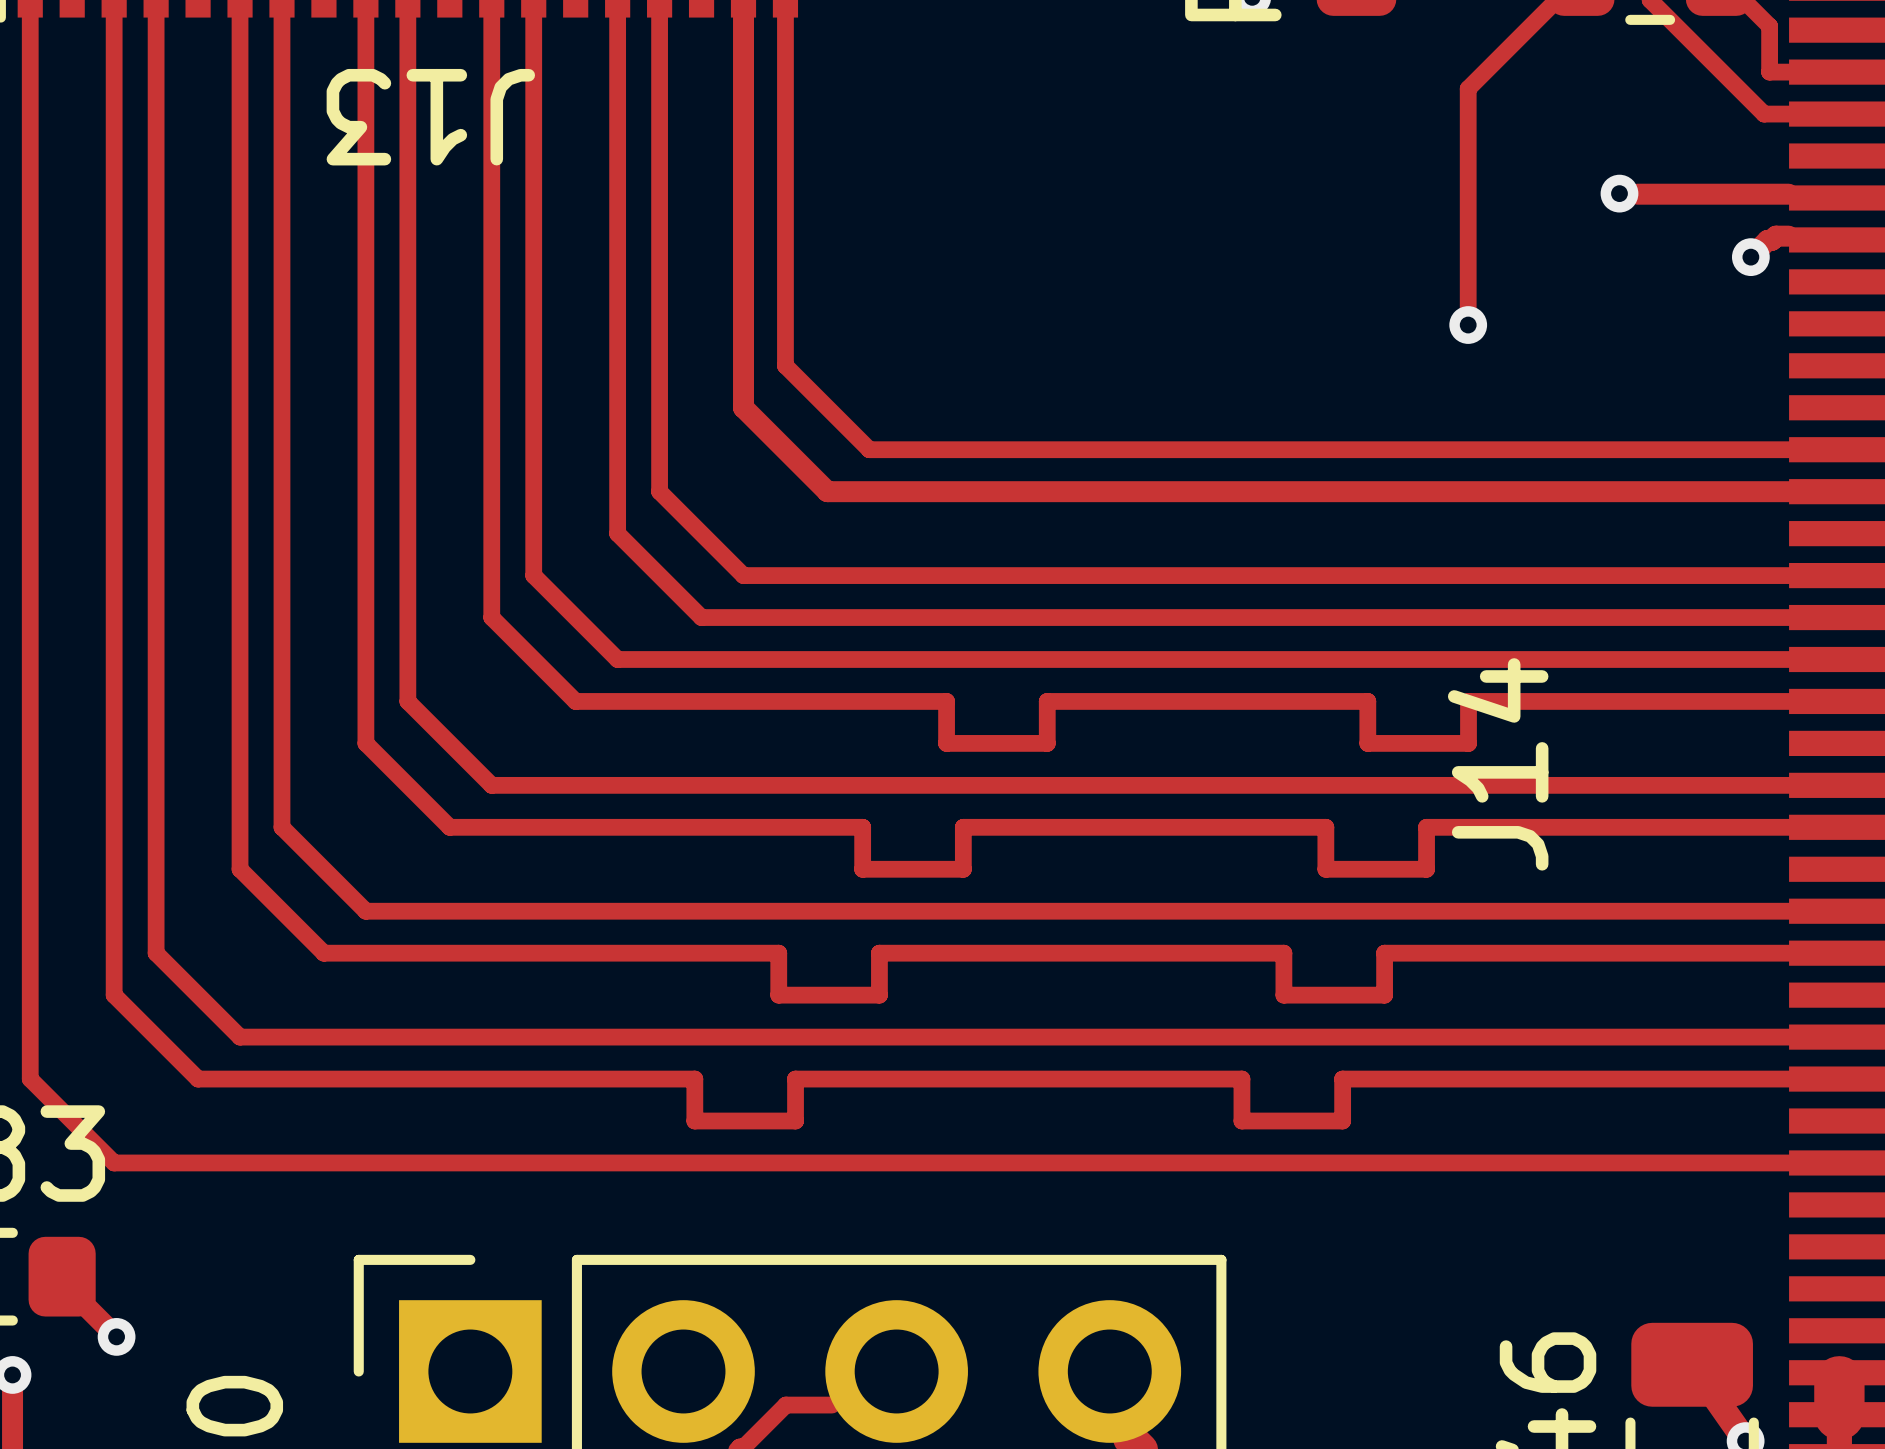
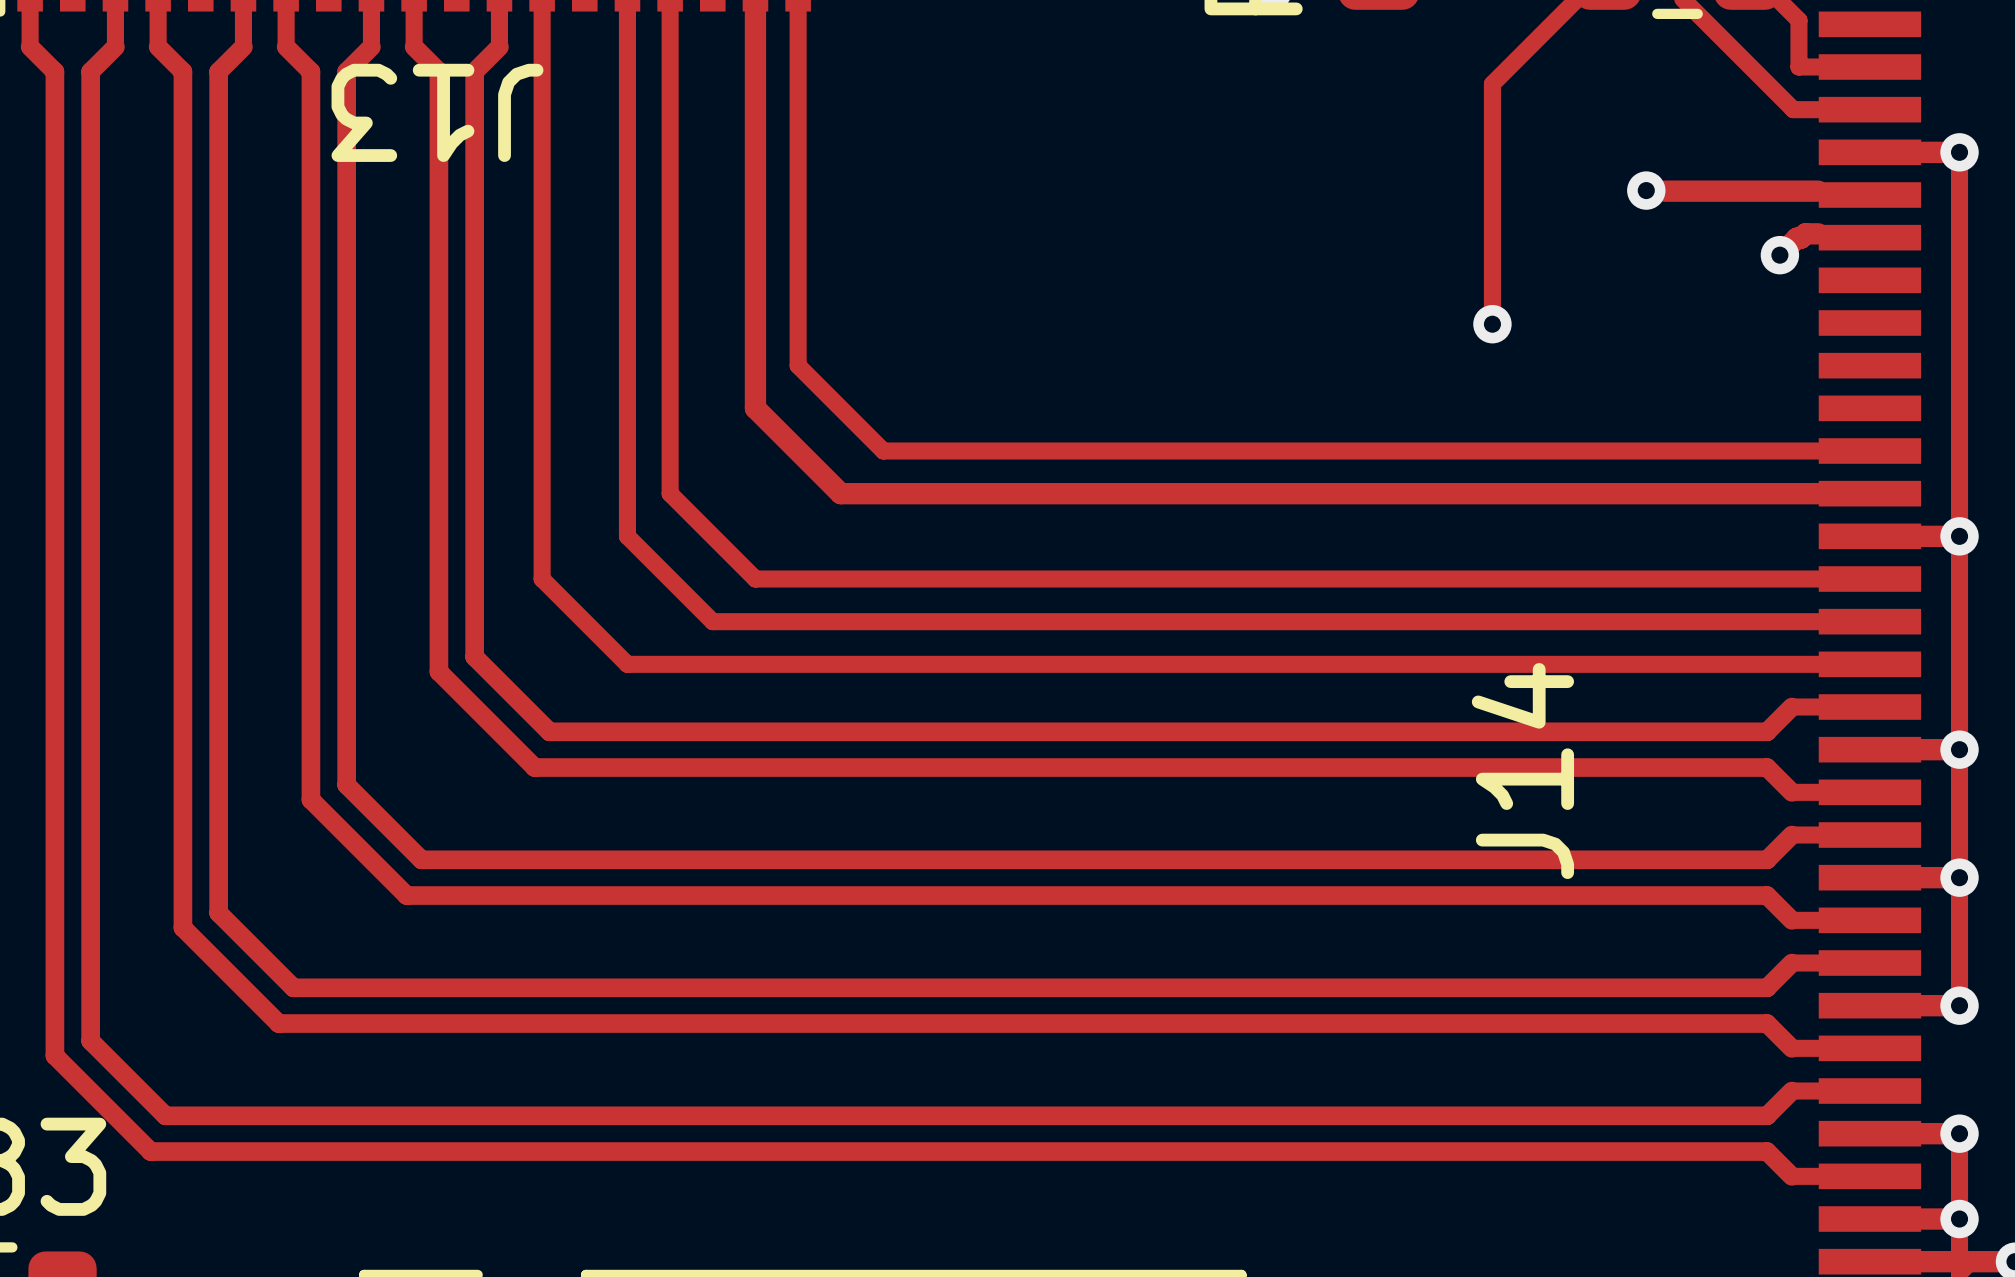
track: (30, 52) (30, 1079) (114, 1162) (1762, 1162) -> (30, 46) (54, 71) (54, 1055) (150, 1151) (1767, 1151) (1791, 1176)
track: (114, 52) (114, 995) (198, 1079) (694, 1079) (694, 1121) (795, 1121) (795, 1079) (1241, 1079) (1241, 1121) (1342, 1121) (1342, 1079) (1762, 1079) -> (115, 46) (90, 71) (90, 1040) (165, 1115) (1767, 1115) (1791, 1091)
track: (156, 52) (156, 953) (240, 1037) (1762, 1037) -> (158, 46) (182, 71) (182, 927) (278, 1023) (1767, 1023) (1791, 1048)
track: (240, 52) (240, 869) (323, 953) (778, 953) (778, 995) (879, 995) (879, 953) (1283, 953) (1283, 995) (1384, 995) (1384, 953) (1762, 953) -> (243, 46) (218, 71) (218, 912) (293, 987) (1767, 987) (1791, 963)
track: (281, 52) (281, 827) (365, 911) (1762, 911) -> (286, 46) (310, 71) (310, 799) (406, 895) (1767, 895) (1791, 920)
track: (365, 52) (365, 743) (449, 827) (862, 827) (862, 869) (963, 869) (963, 827) (1325, 827) (1325, 869) (1426, 869) (1426, 827) (1762, 827) -> (371, 46) (346, 71) (346, 784) (421, 859) (1767, 859) (1791, 835)
track: (407, 52) (407, 701) (491, 785) (1762, 785) -> (414, 46) (438, 71) (438, 671) (534, 767) (1767, 767) (1791, 792)
track: (491, 52) (491, 617) (575, 701) (946, 701) (946, 743) (1047, 743) (1047, 701) (1367, 701) (1367, 743) (1468, 743) (1468, 701) (1762, 701) -> (499, 46) (474, 71) (474, 656) (549, 731) (1767, 731) (1791, 707)

